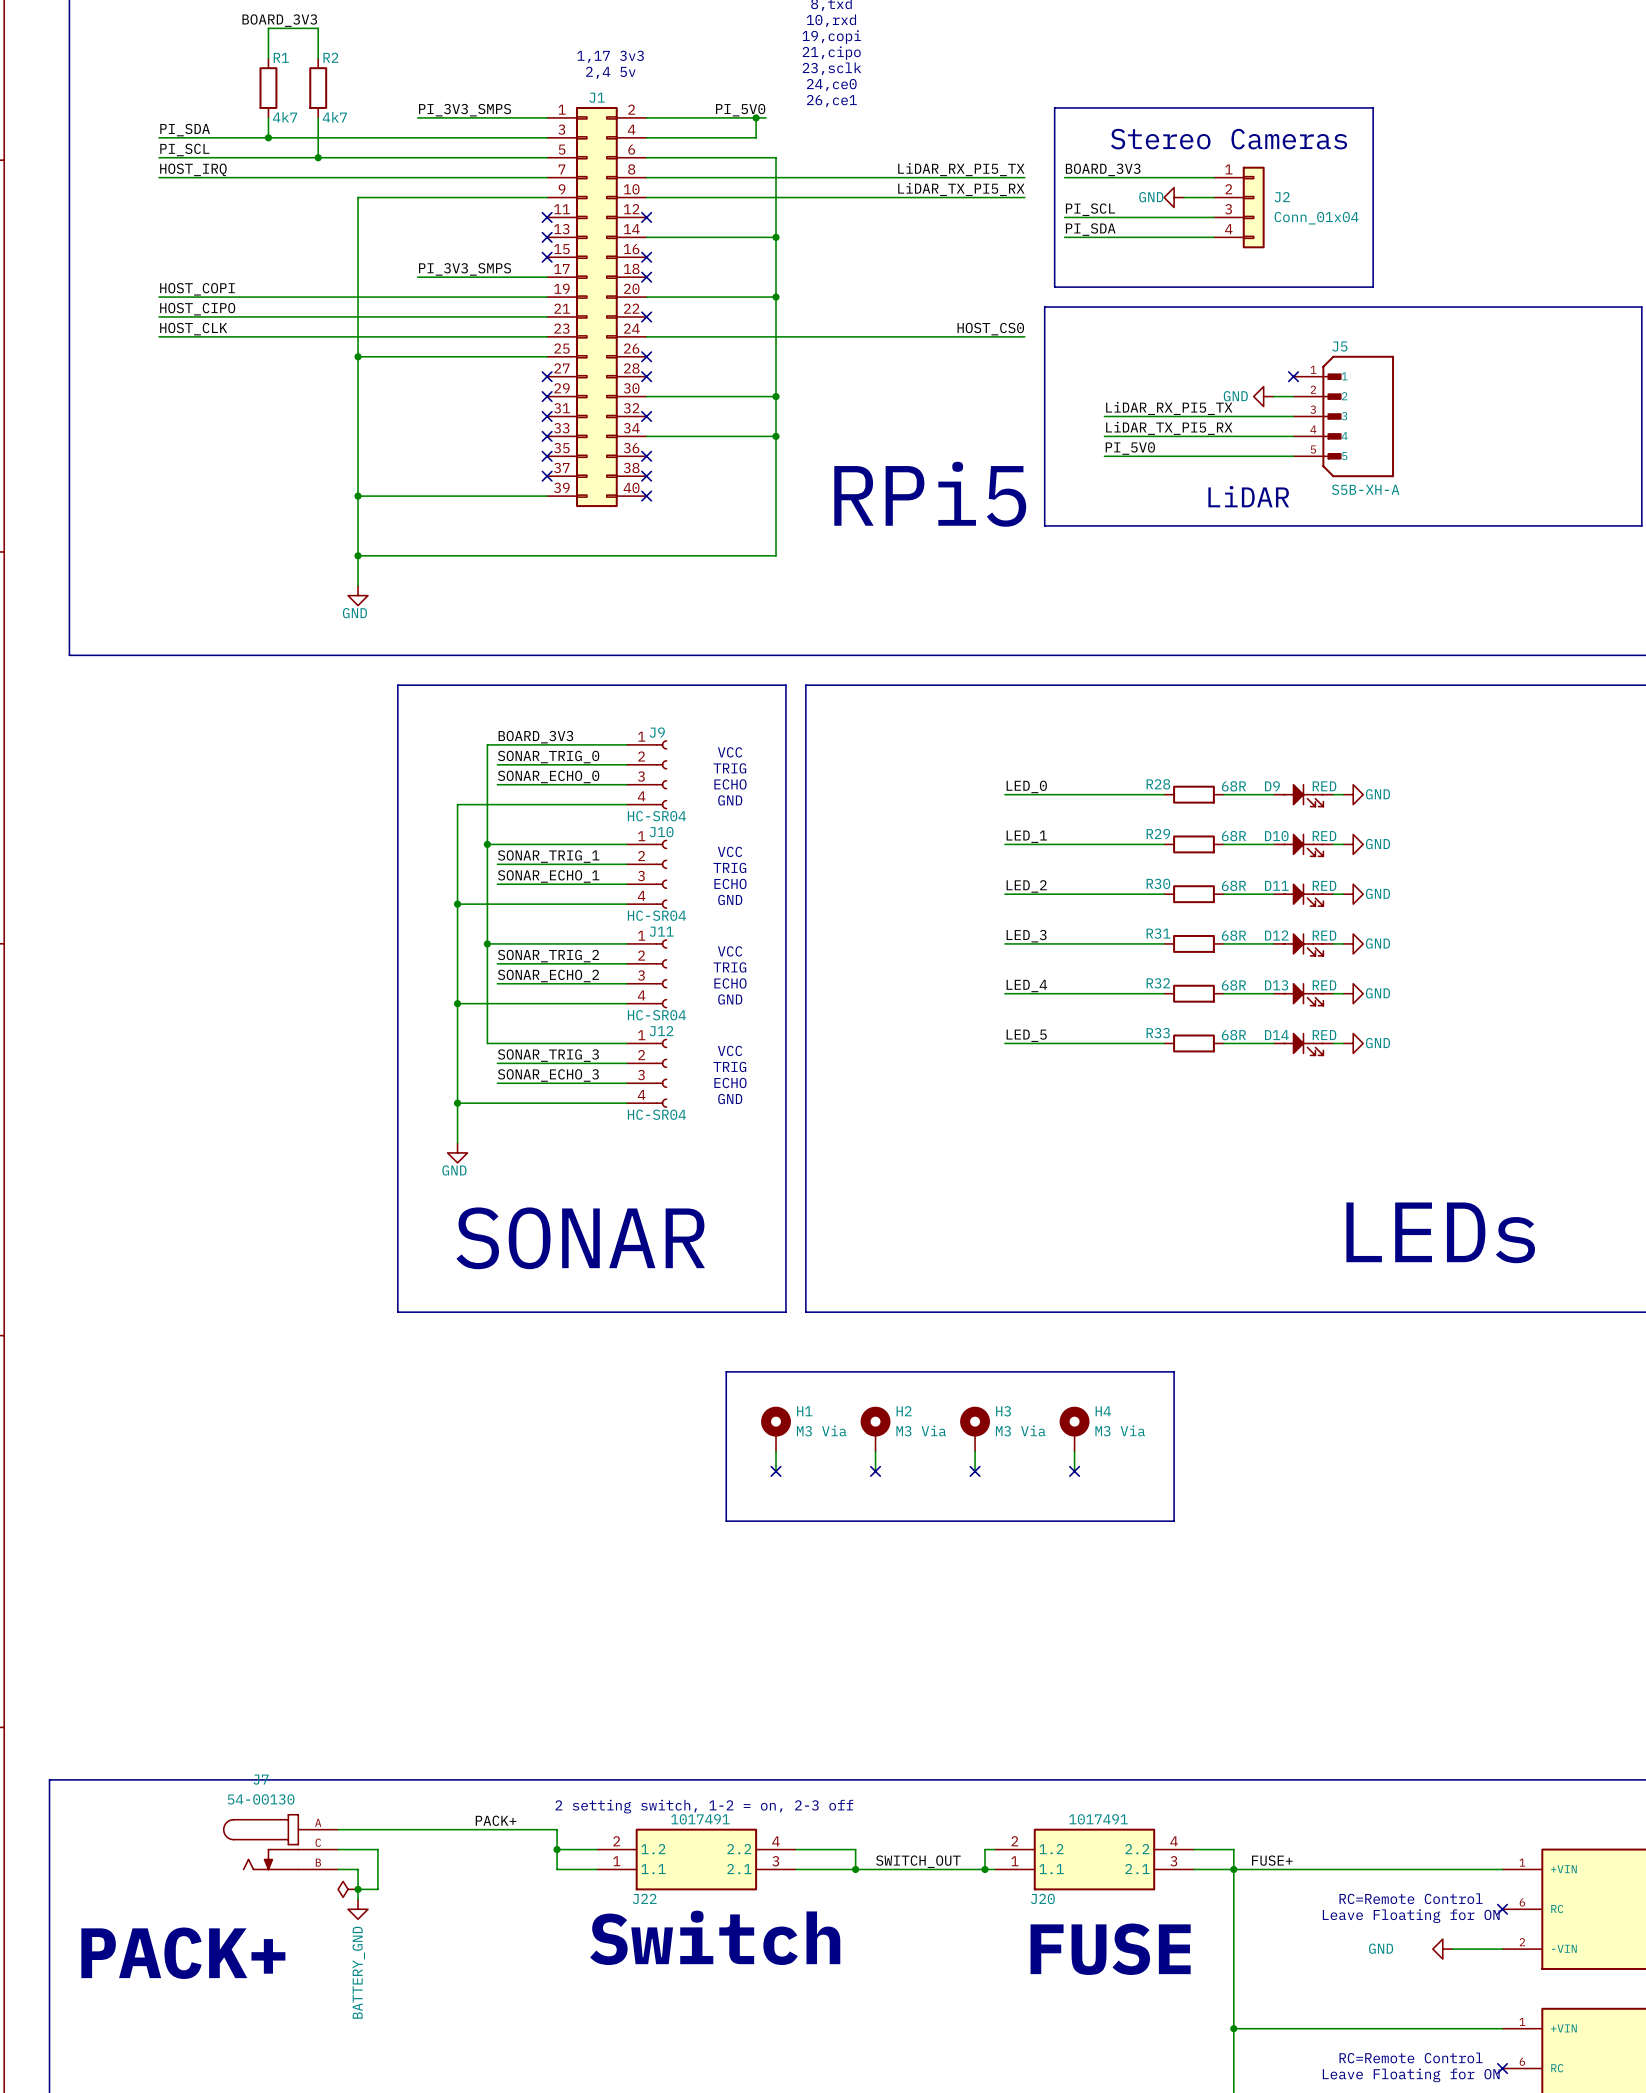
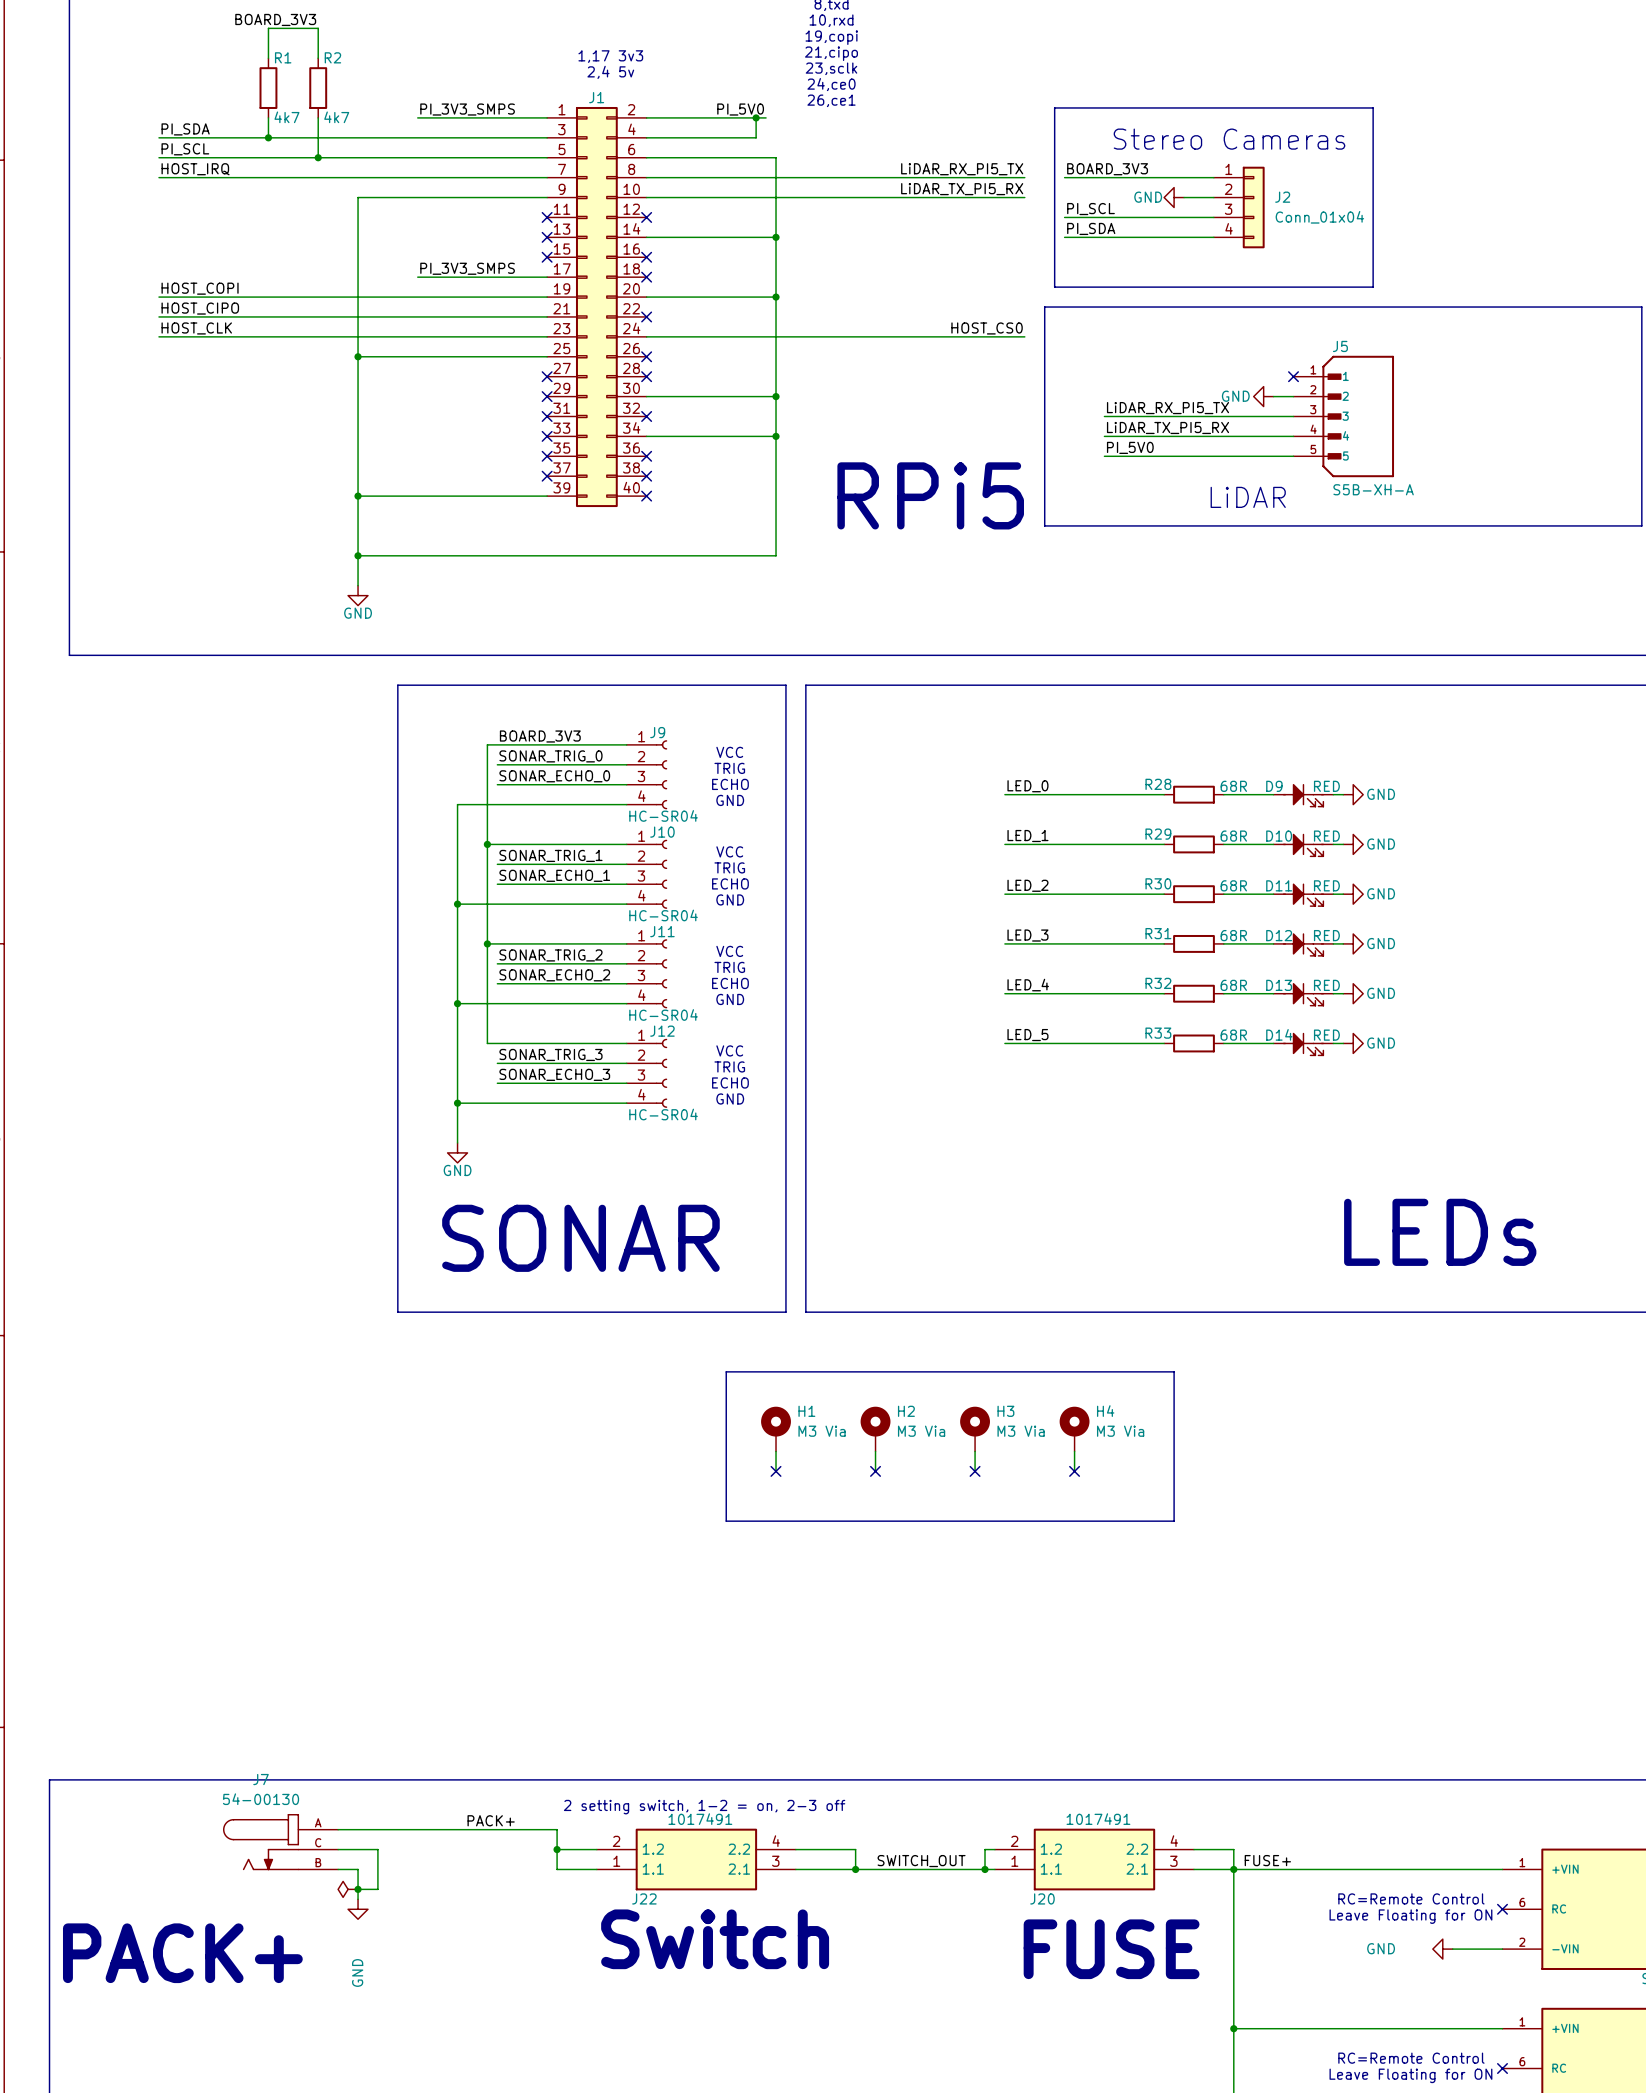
power symbol: BATTERY_GND (358, 1909) -> GND (358, 1909)

